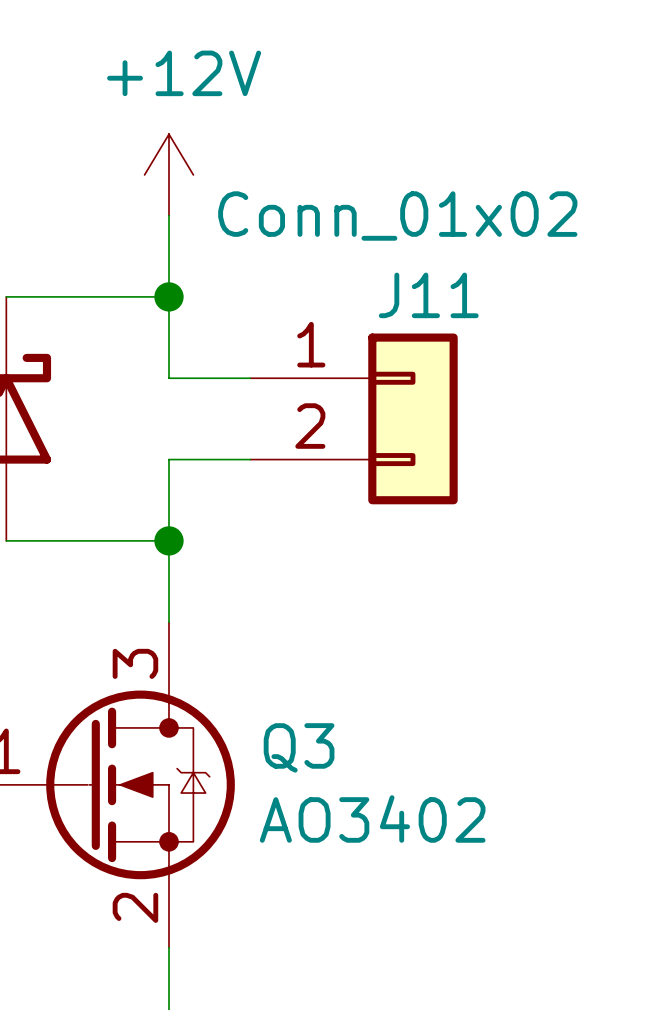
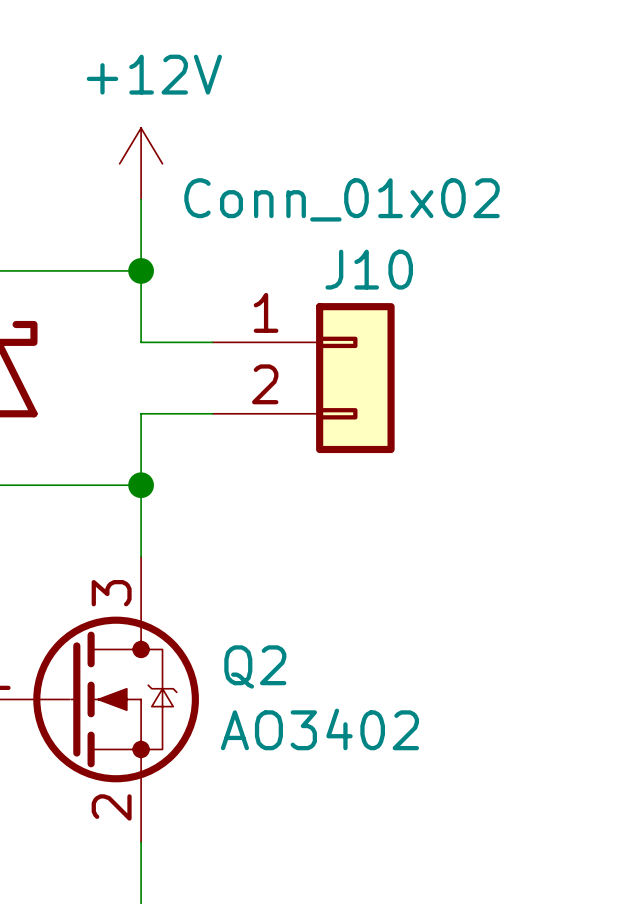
J11 name: J11 (428, 295) -> J10 (369, 269)
Q3 name: Q3 (299, 747) -> Q2 (255, 666)

